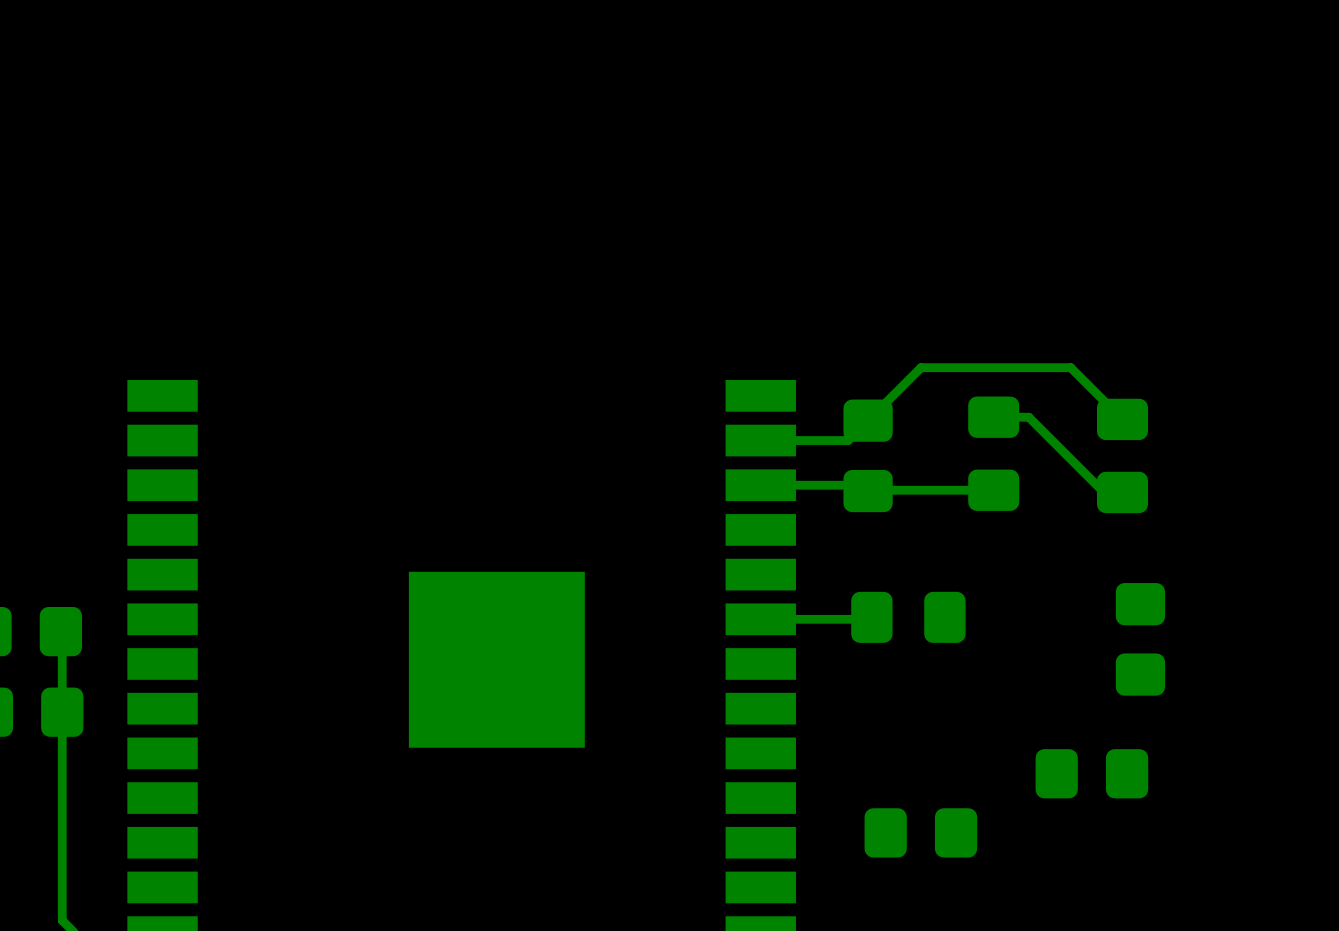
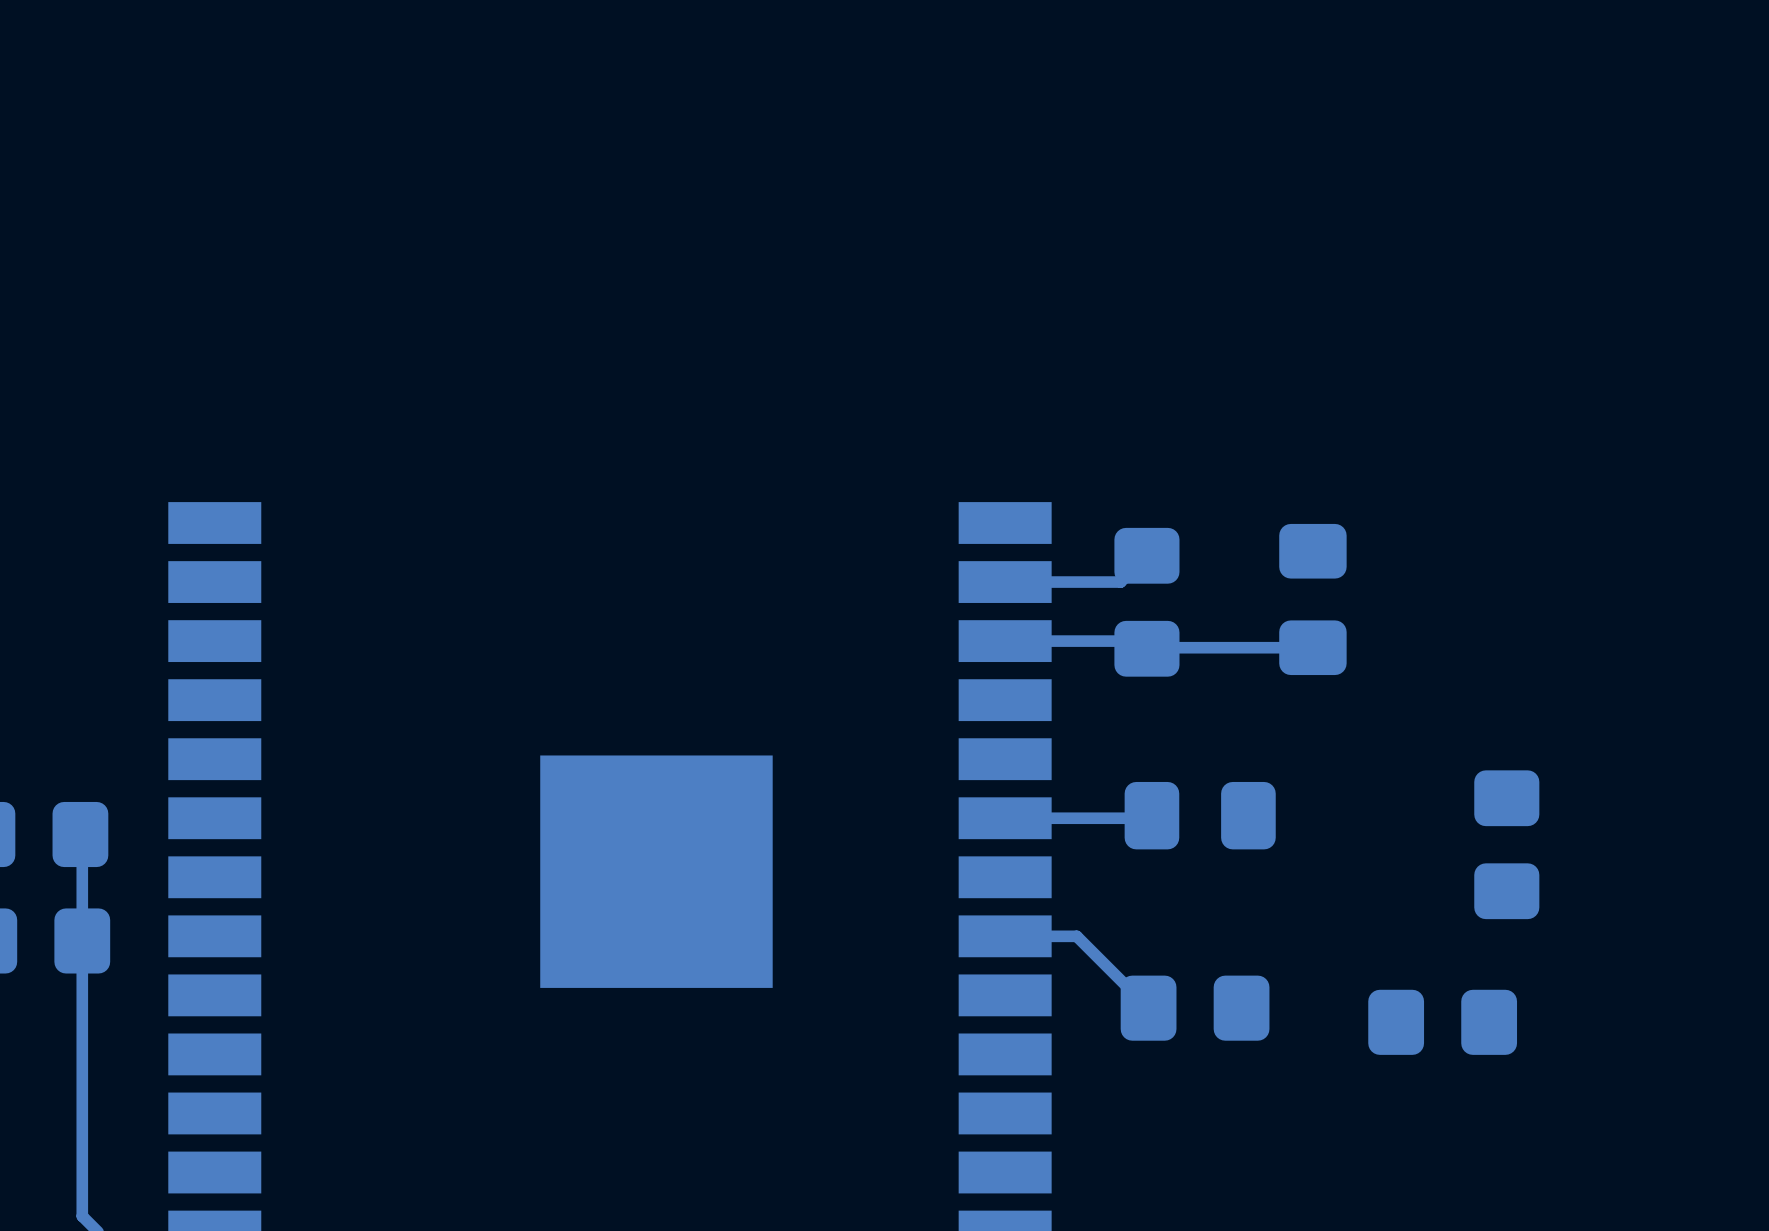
bottom track: (993, 417) (1028, 417) (1104, 492) (1122, 492) -> none
bottom track: (1122, 419) (1070, 367) (921, 367) (868, 420) -> none
part: (1122, 455) -> none
bottom track: none -> (1005, 936) (1076, 936) (1152, 1012)
part position: (920, 832) -> (1195, 1008)

